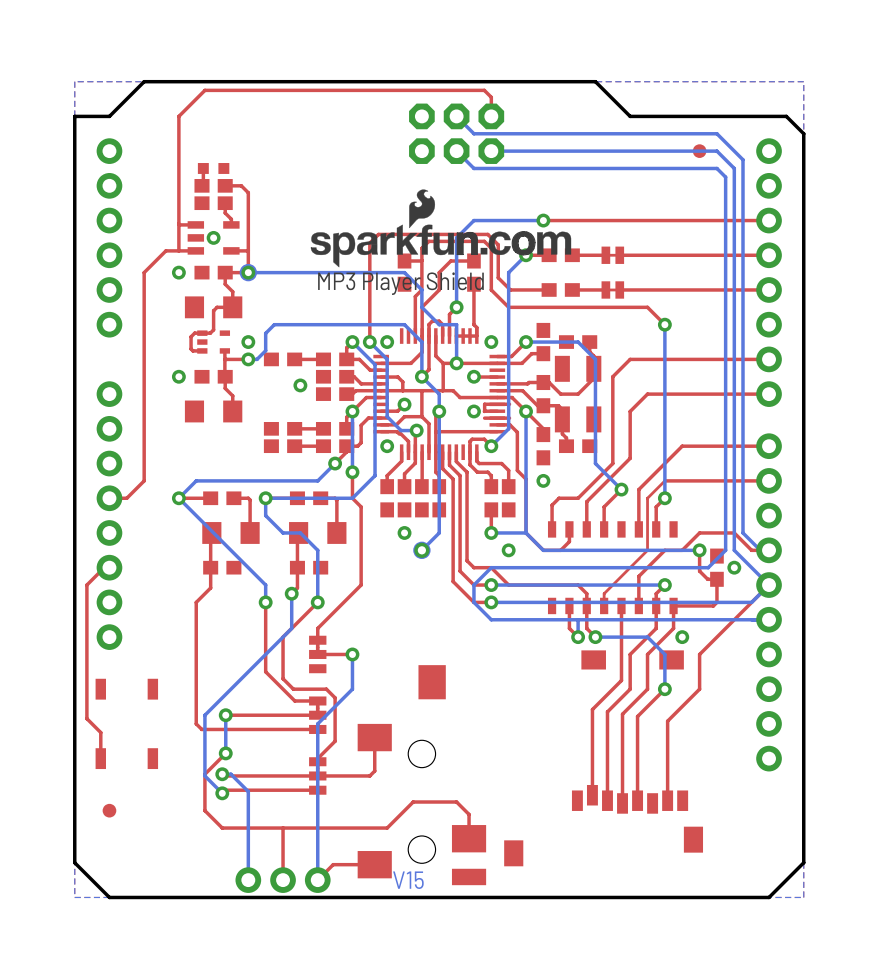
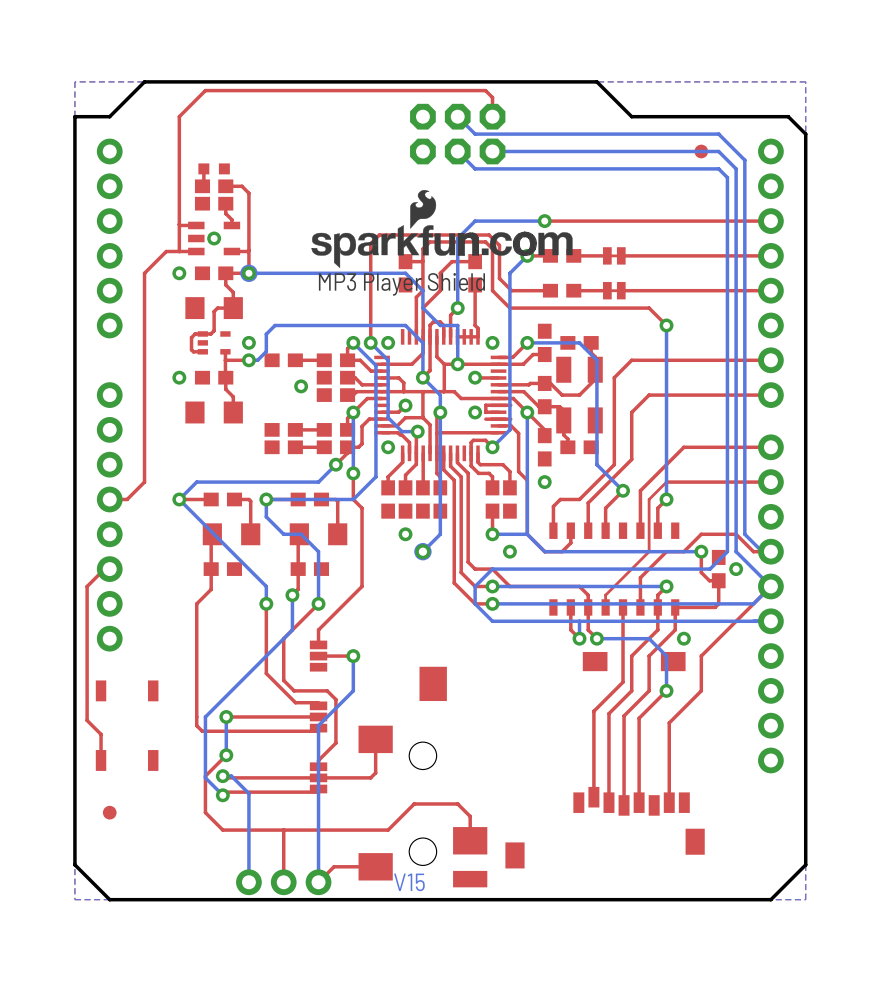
part footprint: [309, 635, 327, 674] -> [309, 640, 328, 672]
part footprint: [309, 696, 327, 734] -> [309, 701, 328, 733]
part footprint: [309, 757, 327, 795] -> [309, 762, 328, 794]

